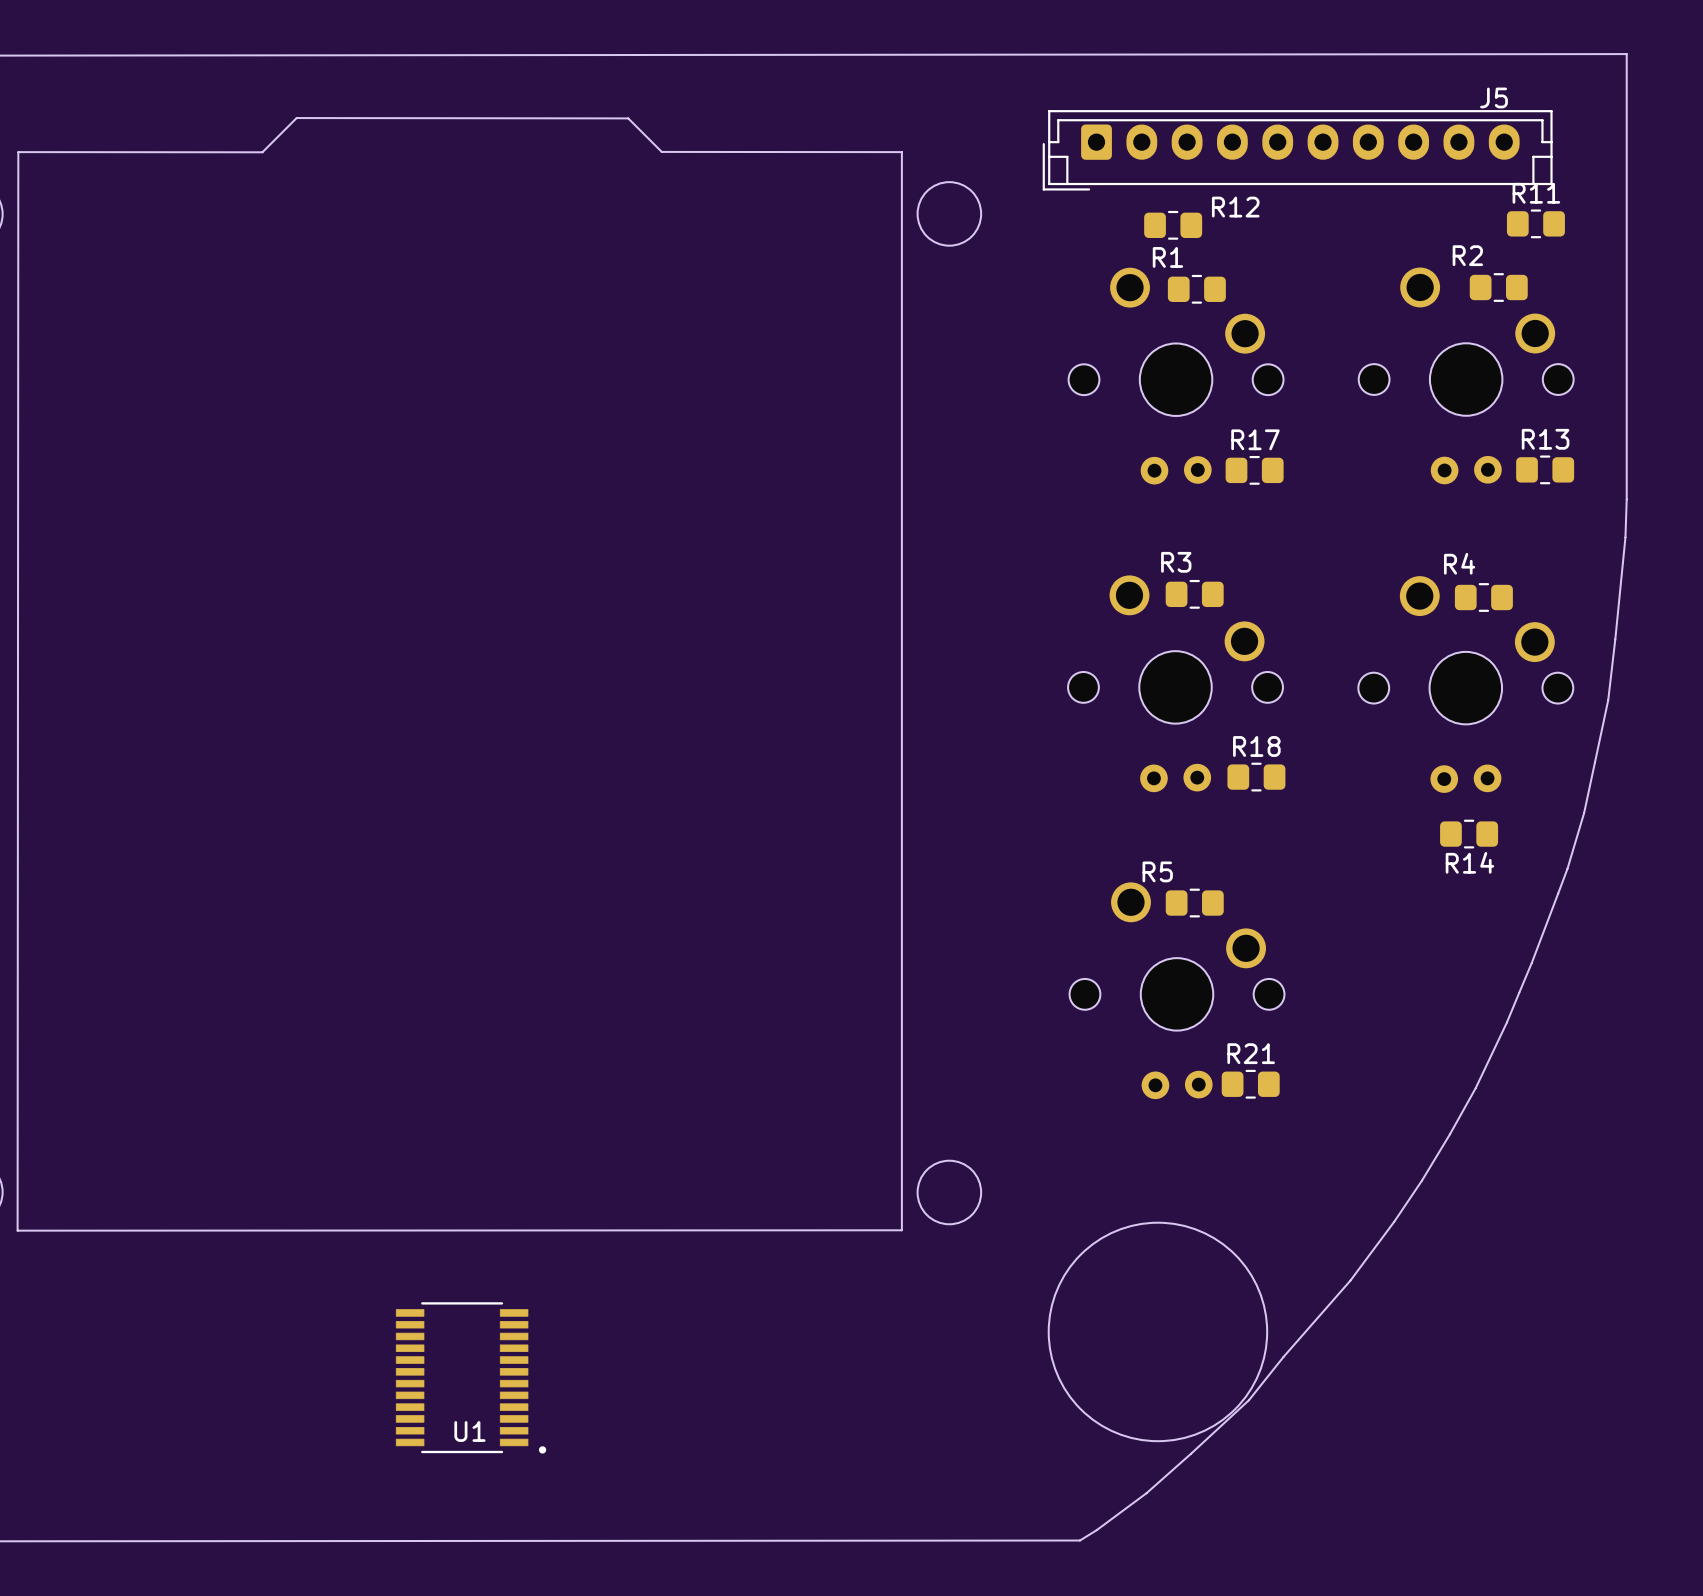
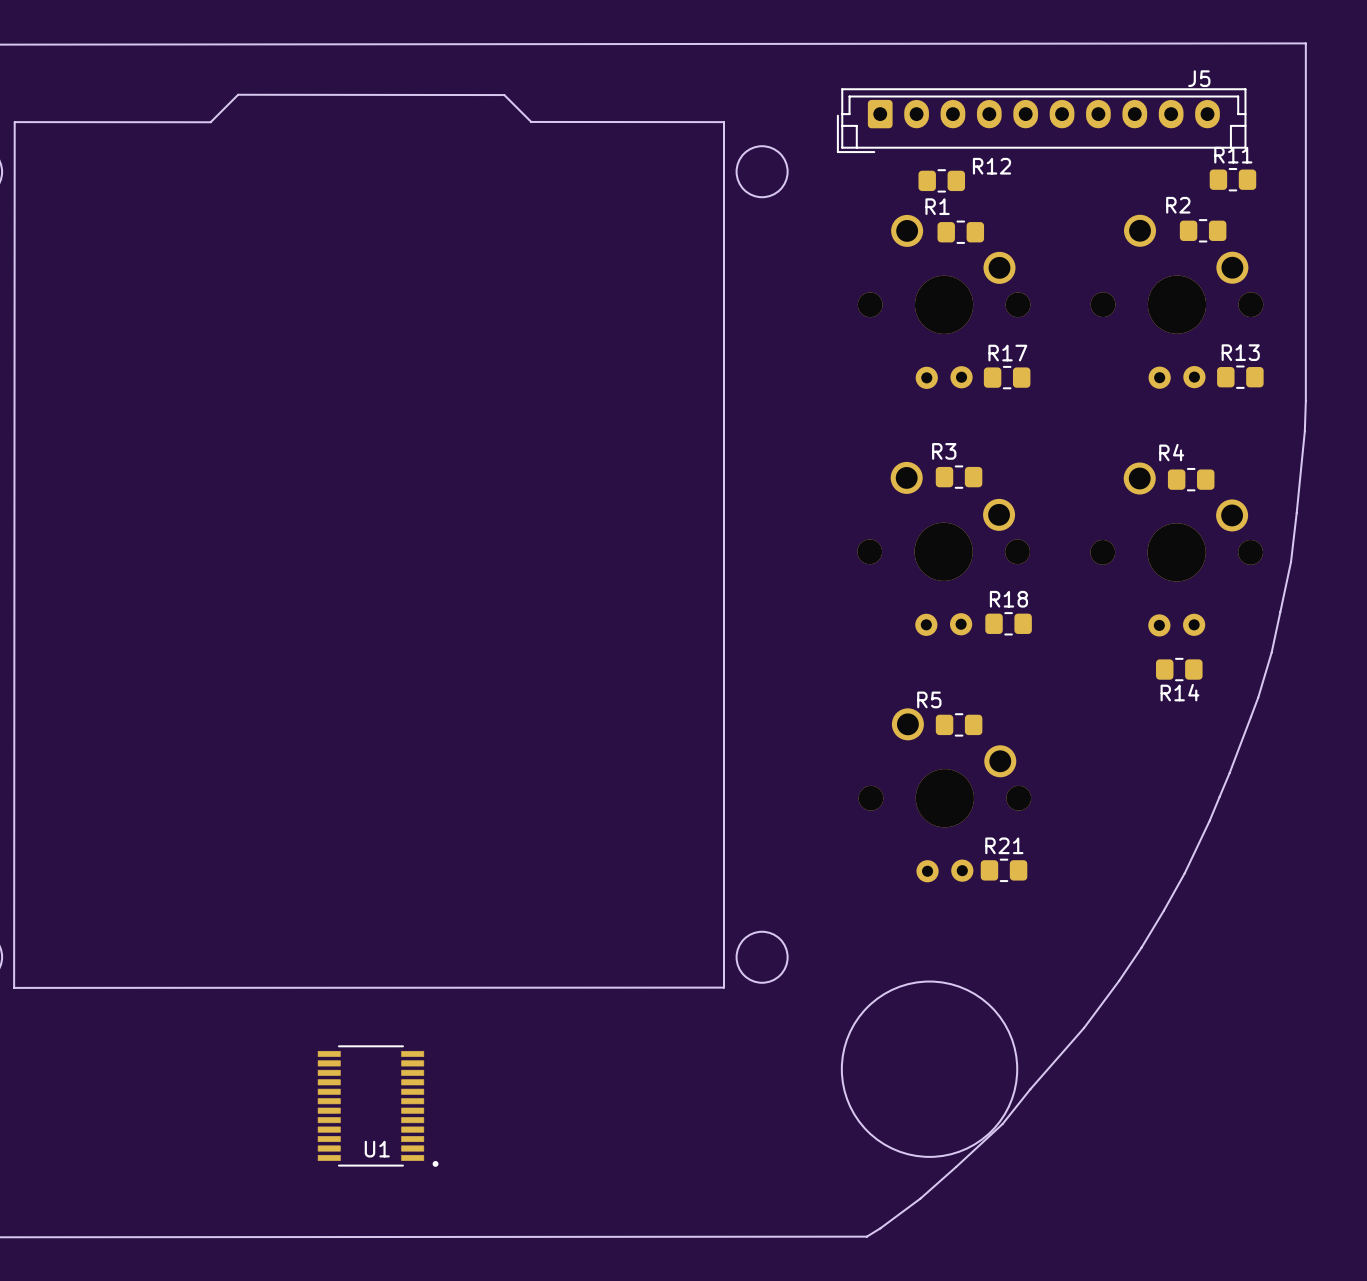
part footprint: [1068, 267, 1284, 485] -> [857, 214, 1031, 389]
part footprint: [1358, 267, 1574, 485] -> [1090, 214, 1264, 389]
part footprint: [1068, 575, 1283, 793] -> [857, 461, 1030, 636]
part footprint: [1358, 576, 1574, 793] -> [1090, 462, 1263, 637]
part footprint: [1069, 882, 1285, 1100] -> [858, 708, 1032, 883]

